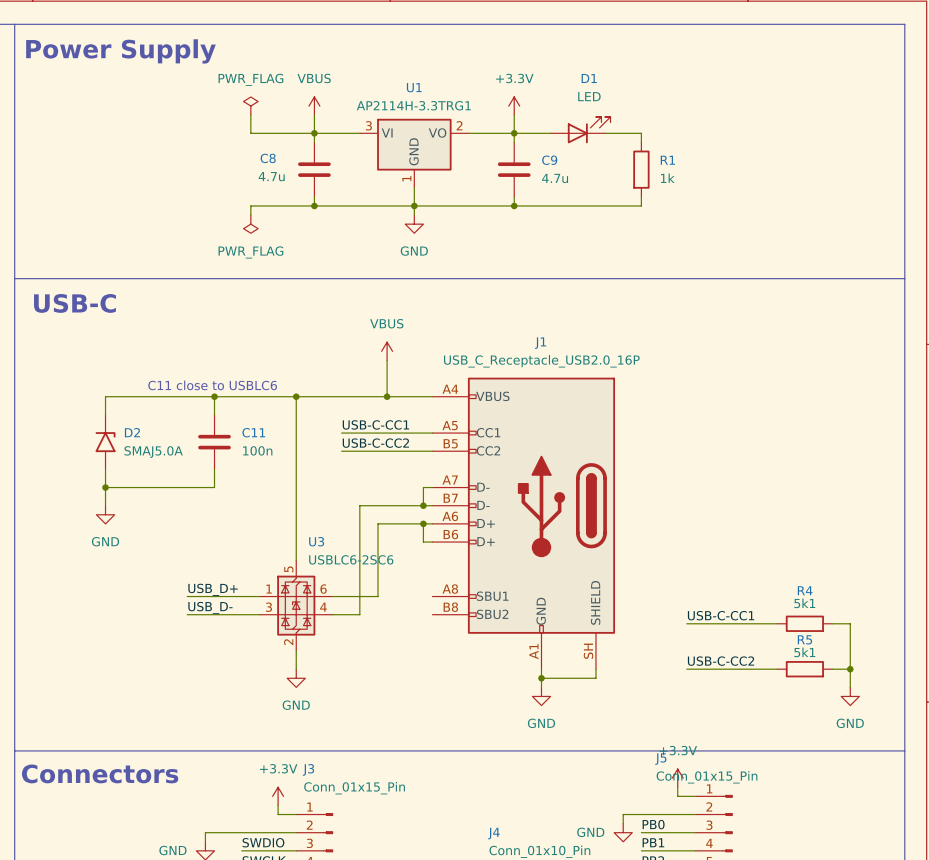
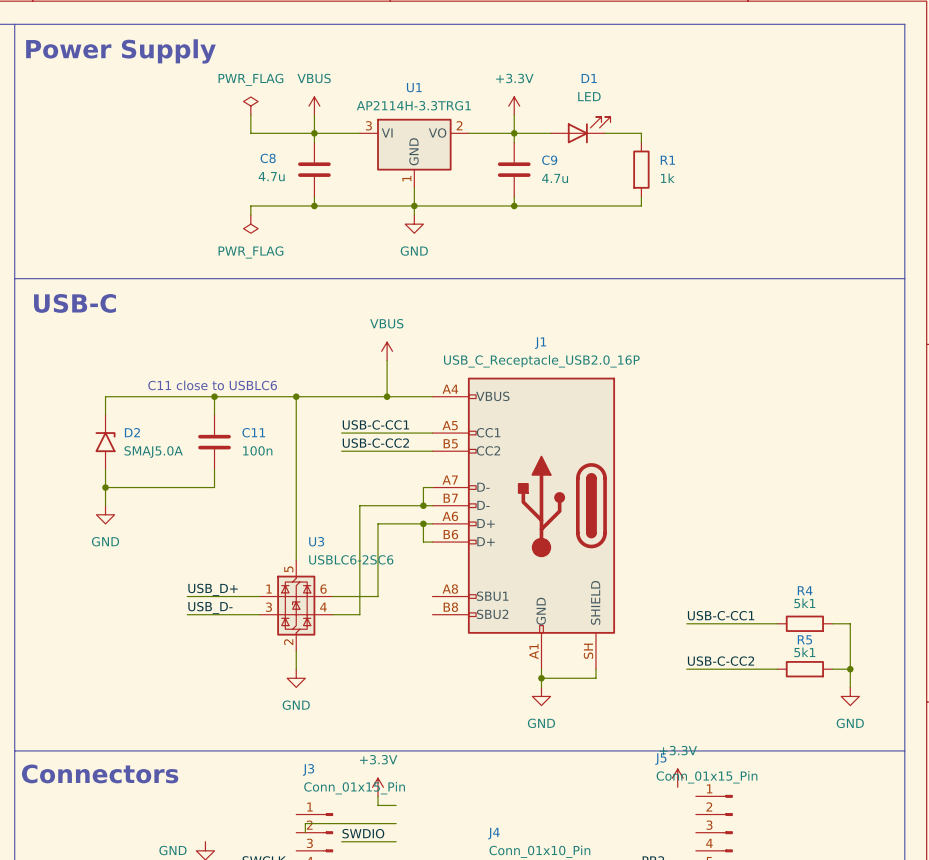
wire: (677, 787) (677, 796) (695, 796) -> none
power symbol position: +3.3V (278, 796) -> +3.3V (378, 787)
wire: (278, 805) (278, 814) (296, 814) -> (378, 796) (378, 805) (396, 805)
wire: (695, 814) (623, 814) (623, 823) -> none
label: PB0 (653, 824) -> none
wire: (296, 832) (205, 832) (205, 841) -> (396, 823) (305, 823) (305, 832)
power symbol: GND (623, 832) -> none
wire: (641, 832) (695, 832) -> none
label position: SWDIO (263, 842) -> SWDIO (363, 833)
label: PB1 (653, 842) -> none
wire: (241, 850) (296, 850) -> (341, 841) (396, 841)
wire: (641, 850) (695, 850) -> none

